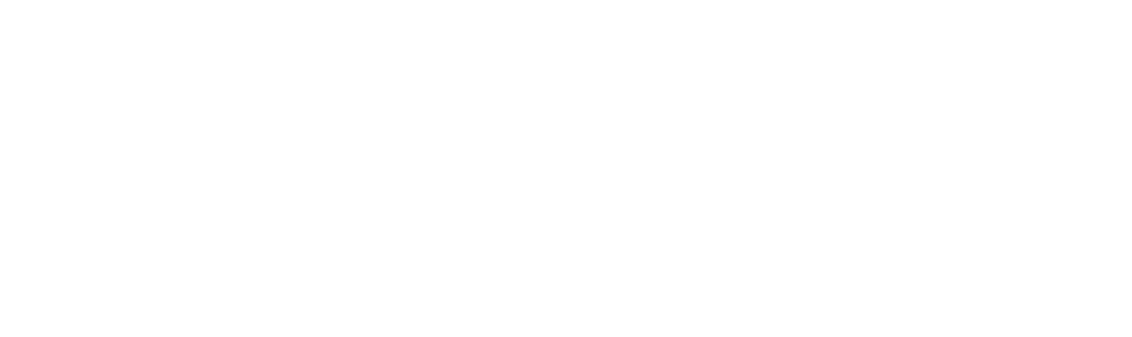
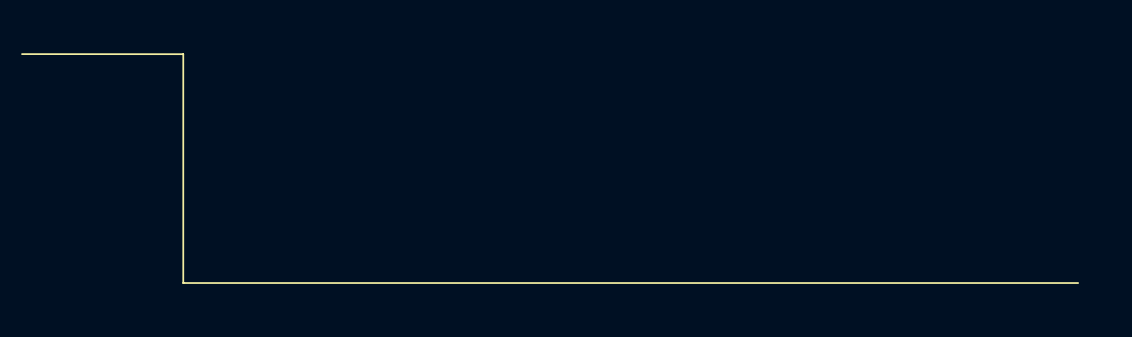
line: none -> (22, 54) (183, 54) (183, 283)
line: none -> (1078, 283) (183, 283)

